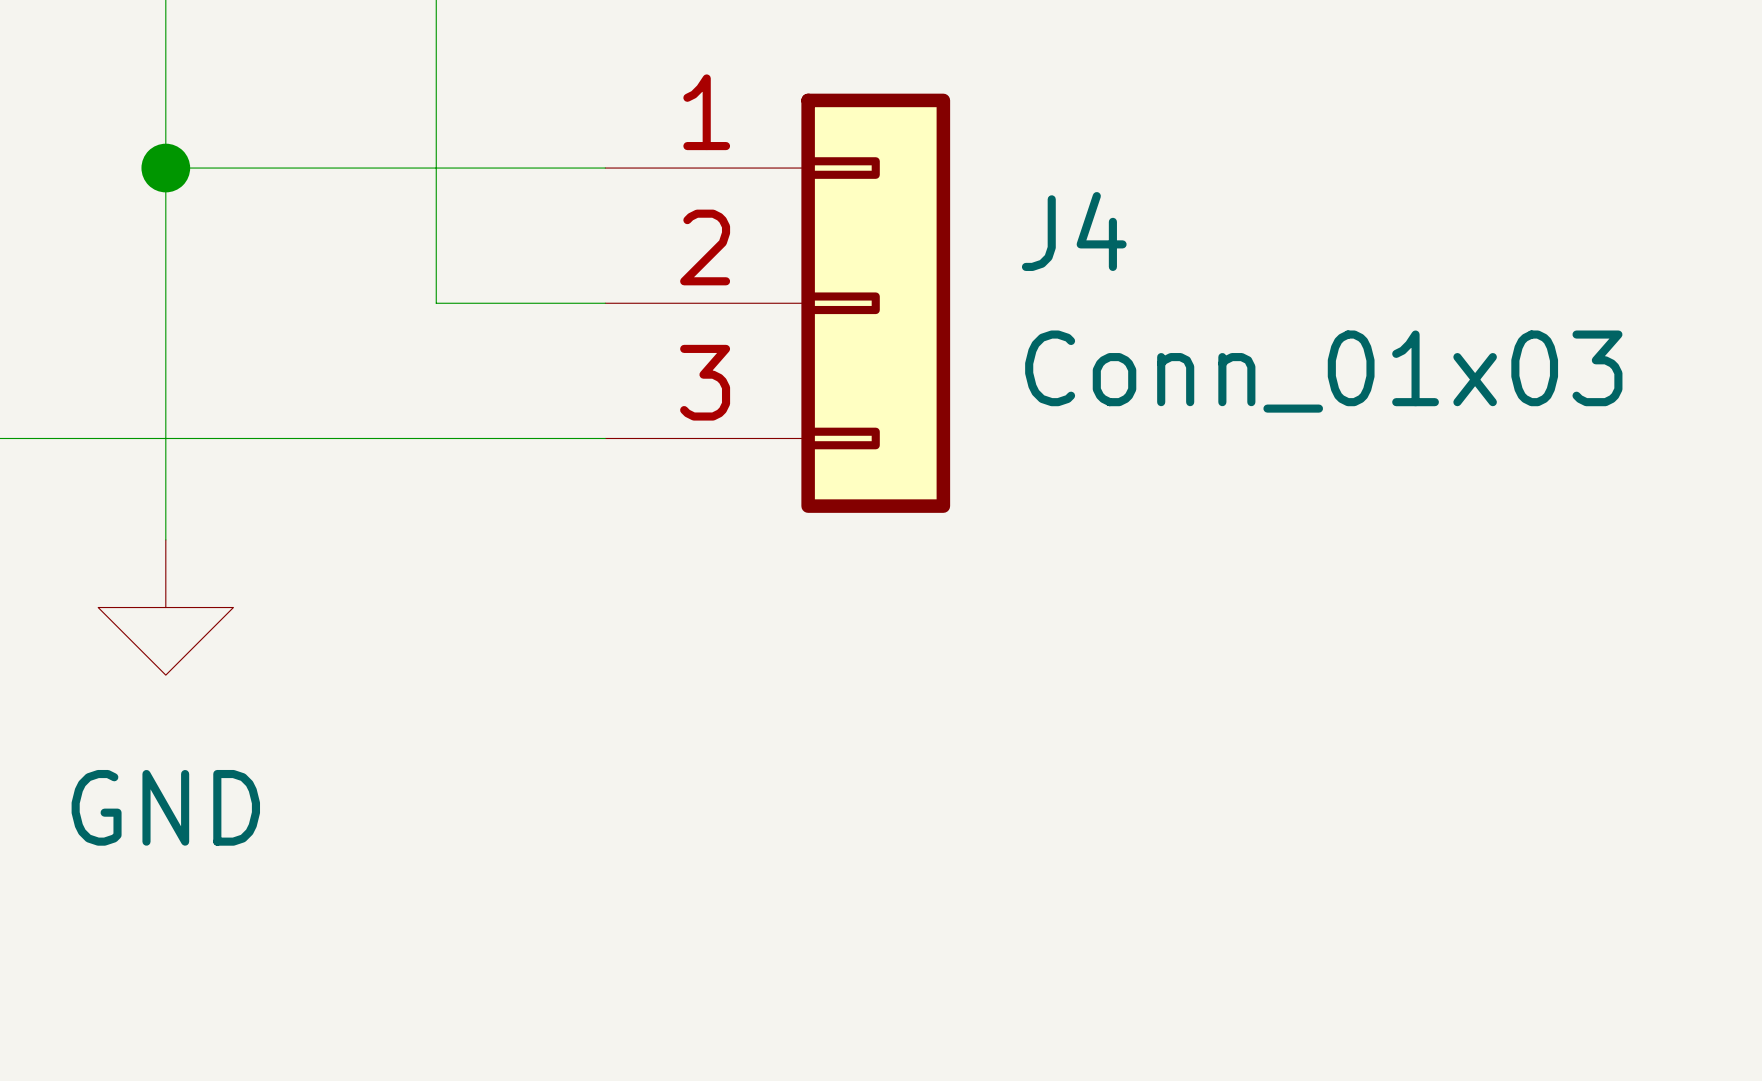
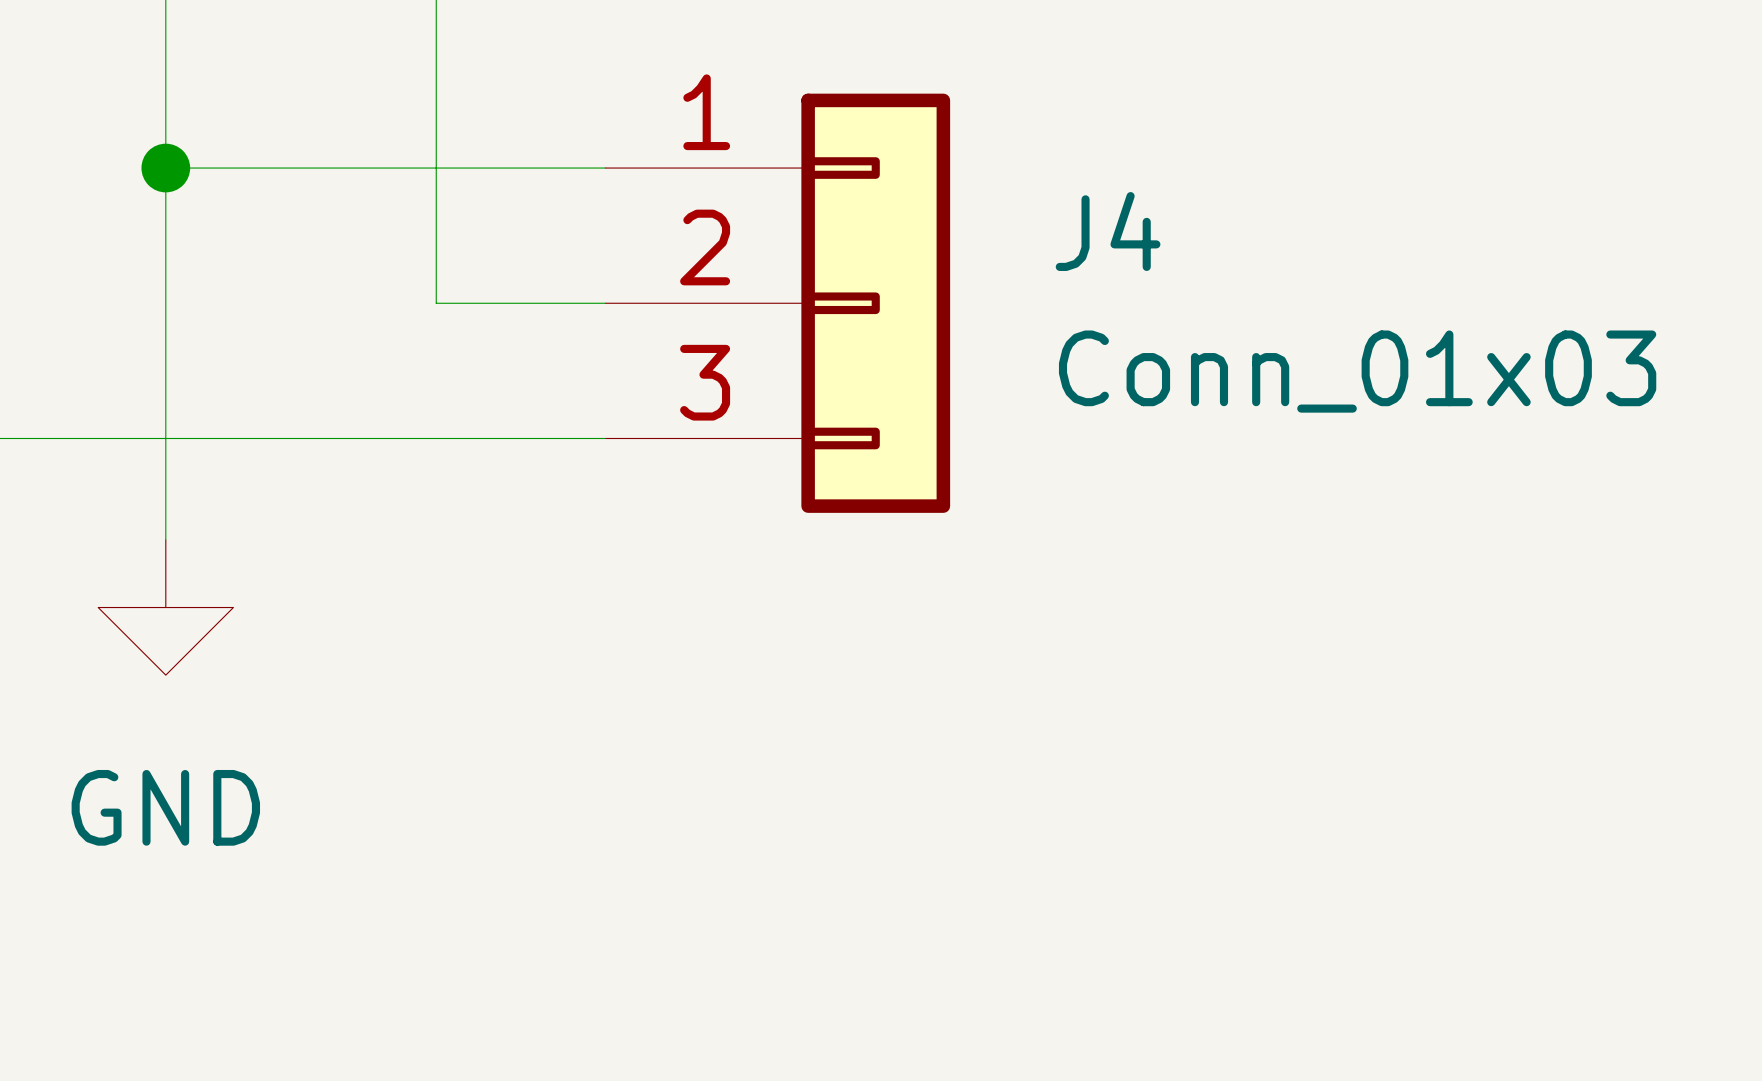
J4 name position: J4 (1074, 231) -> J4 (1108, 231)
J4 value position: Conn_01x03 (1323, 371) -> Conn_01x03 (1357, 371)

